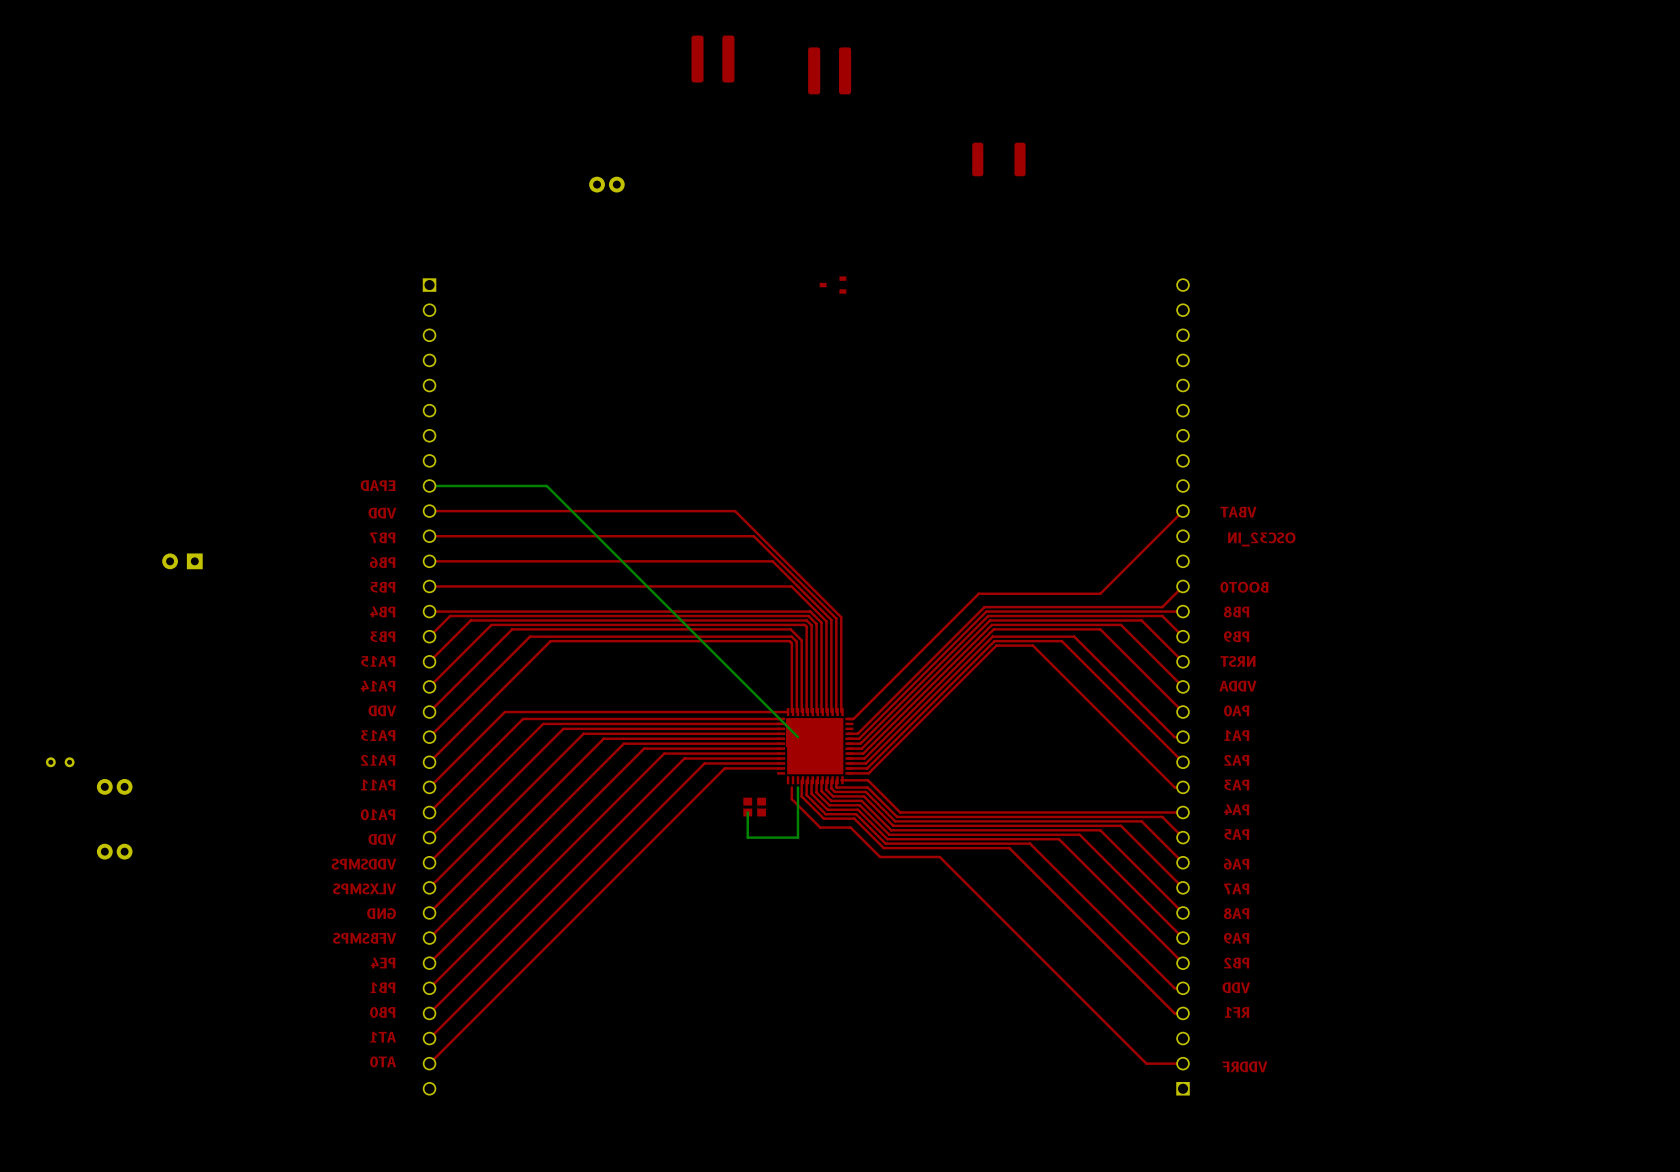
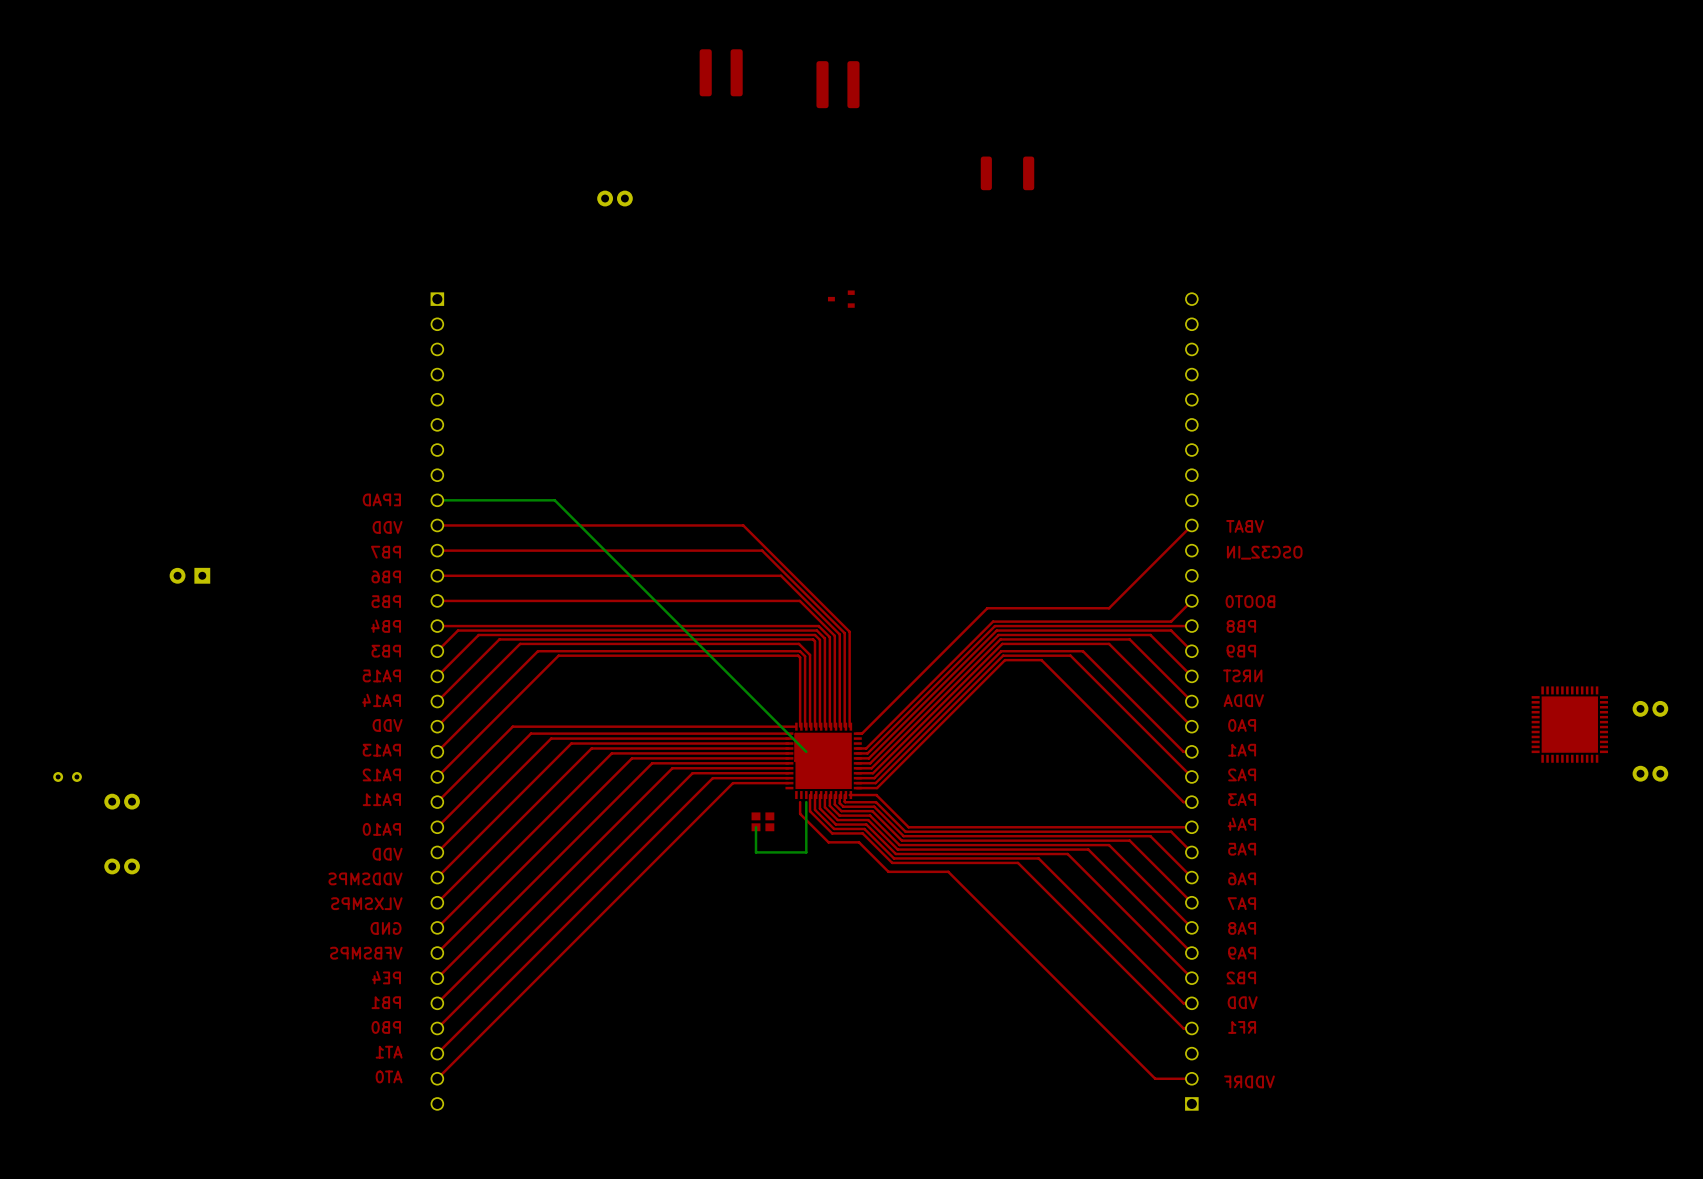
part: none -> (1650, 708)
part: none -> (1569, 724)
part: none -> (1650, 773)

